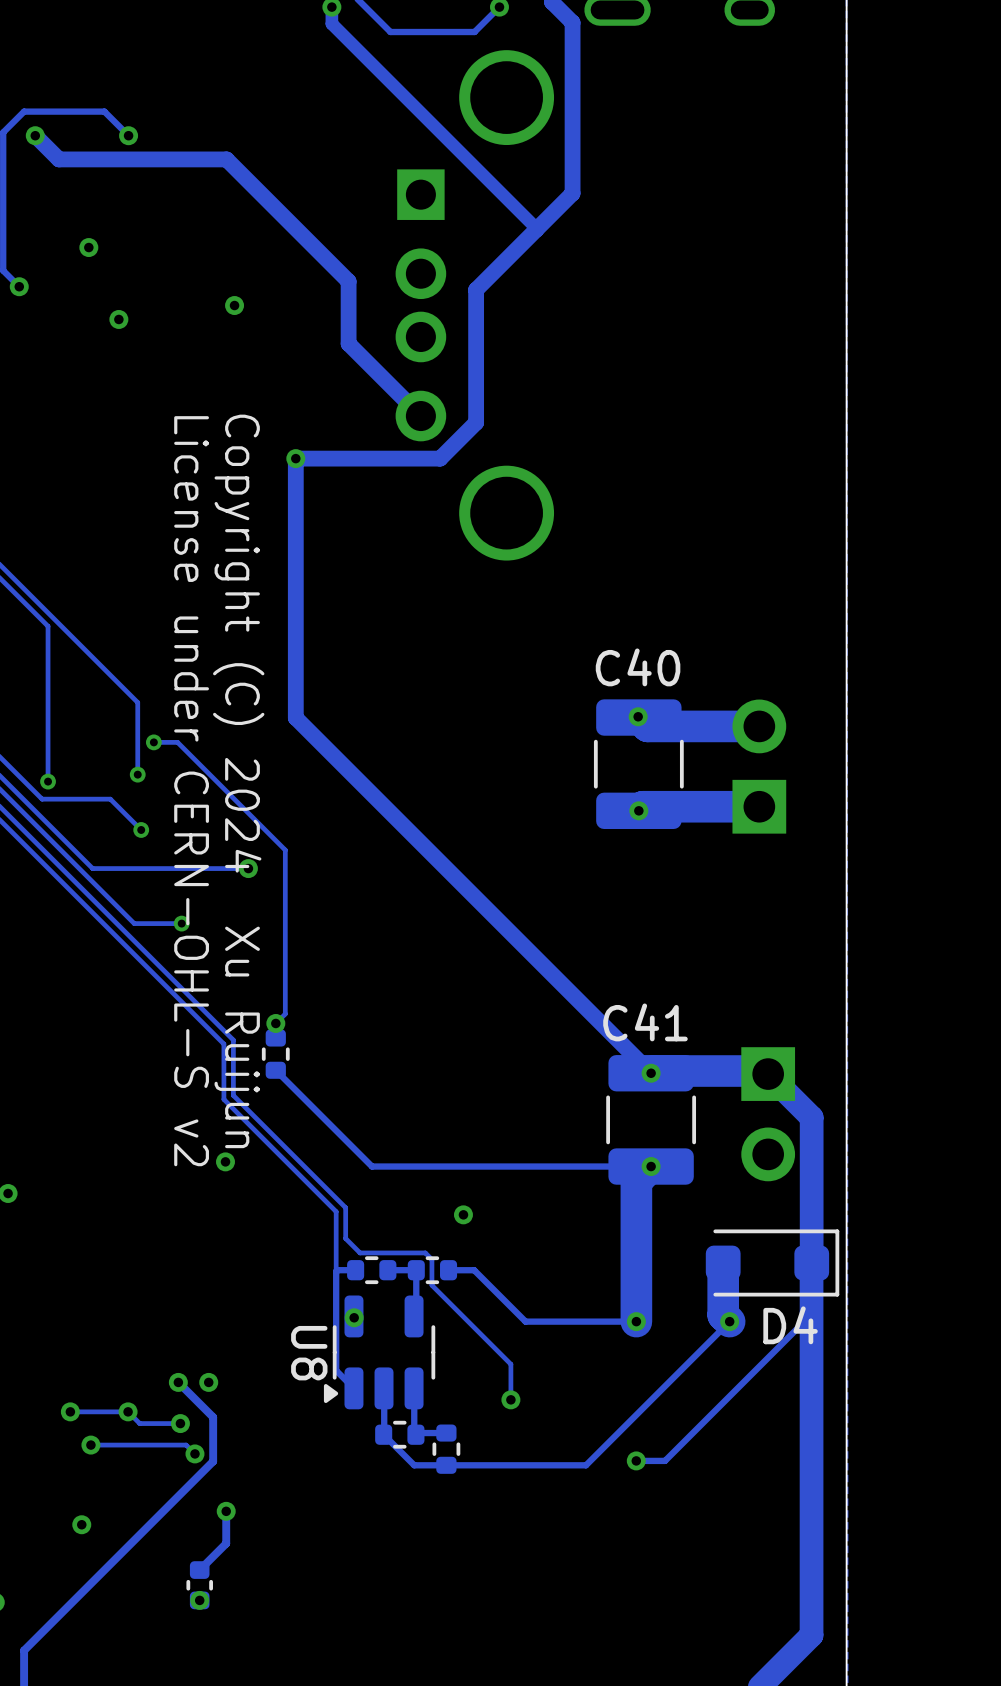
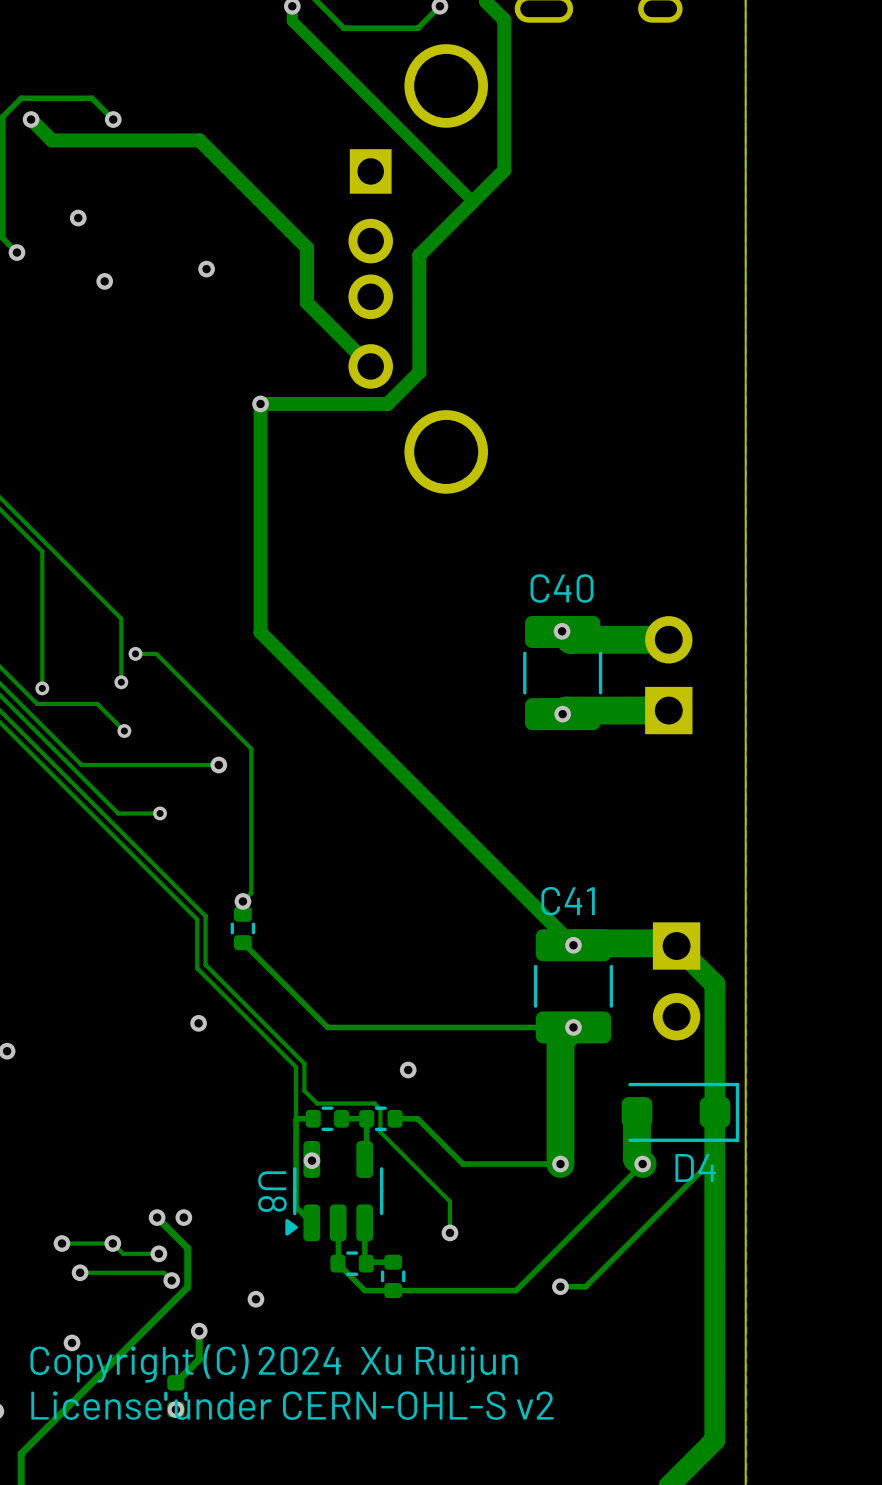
text: Copyright (C) 2024 Xu Ruijun (238, 781) -> none
text: License under CERN-OHL-S v2 (191, 791) -> none
via: none -> (255, 1299)
text: none -> Copyright (C) 2024 Xu Ruijun (273, 1363)
text: none -> License under CERN-OHL-S v2 (292, 1405)

